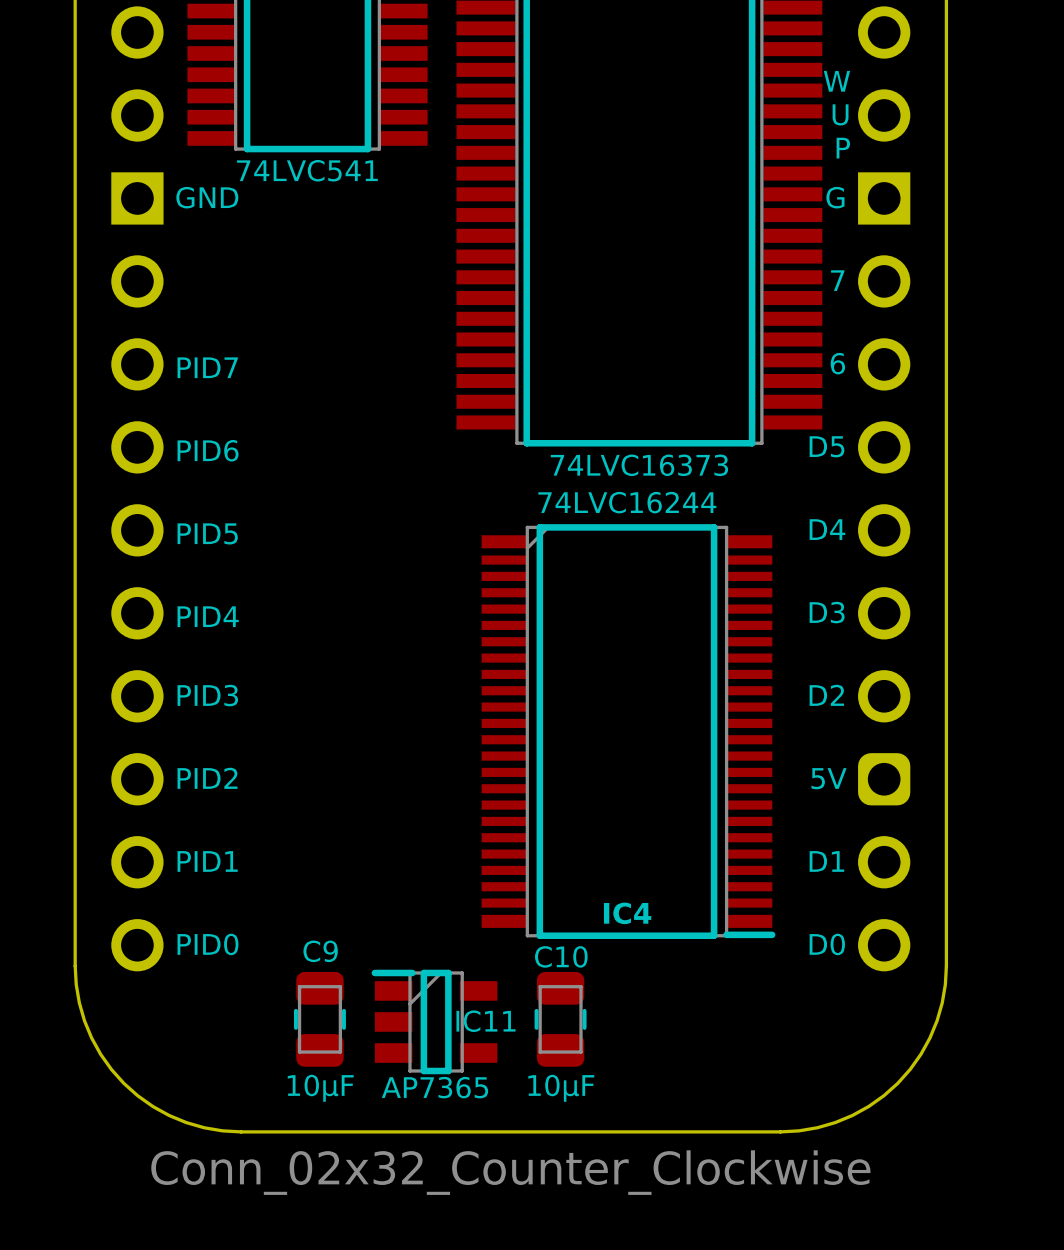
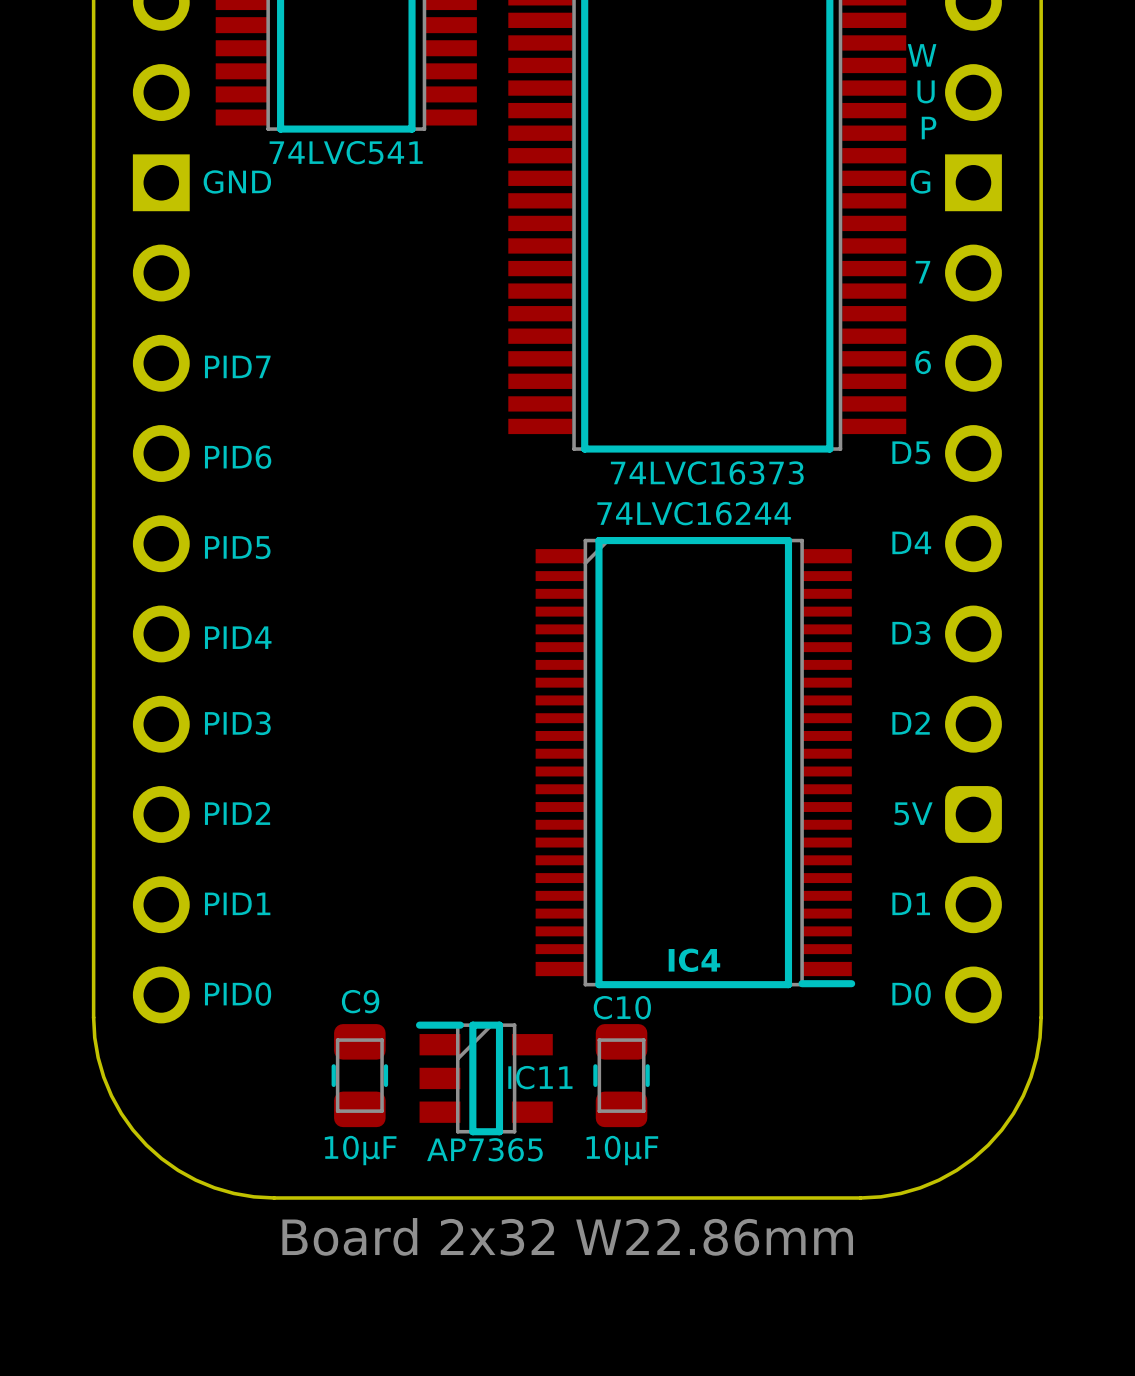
part value: Conn_02x32_Counter_Clockwise (510, 1172) -> Board 2x32 W22.86mm (567, 1236)

